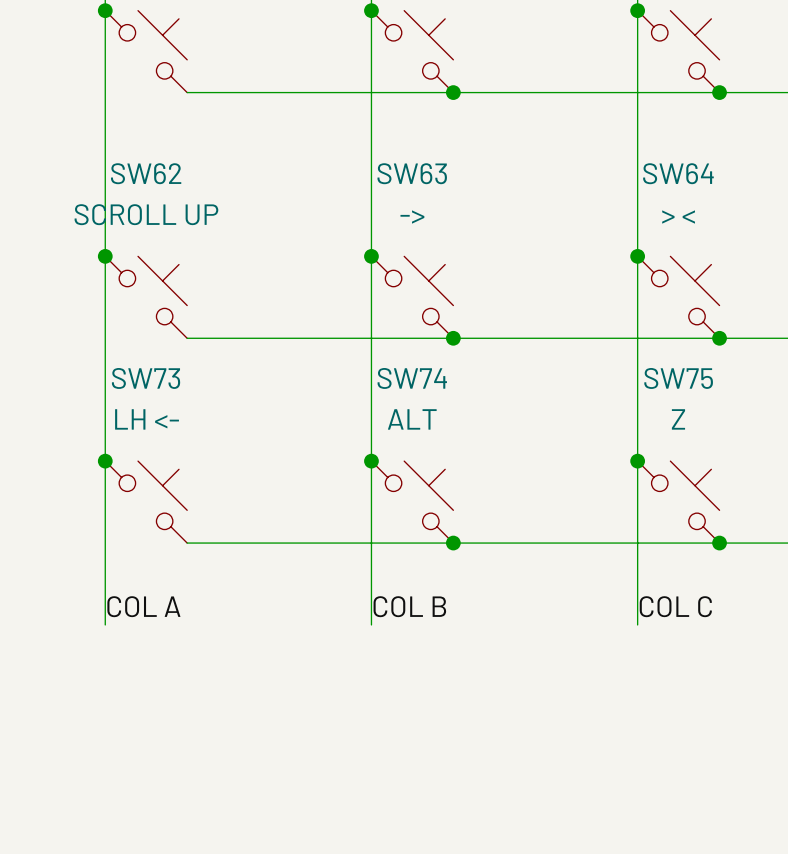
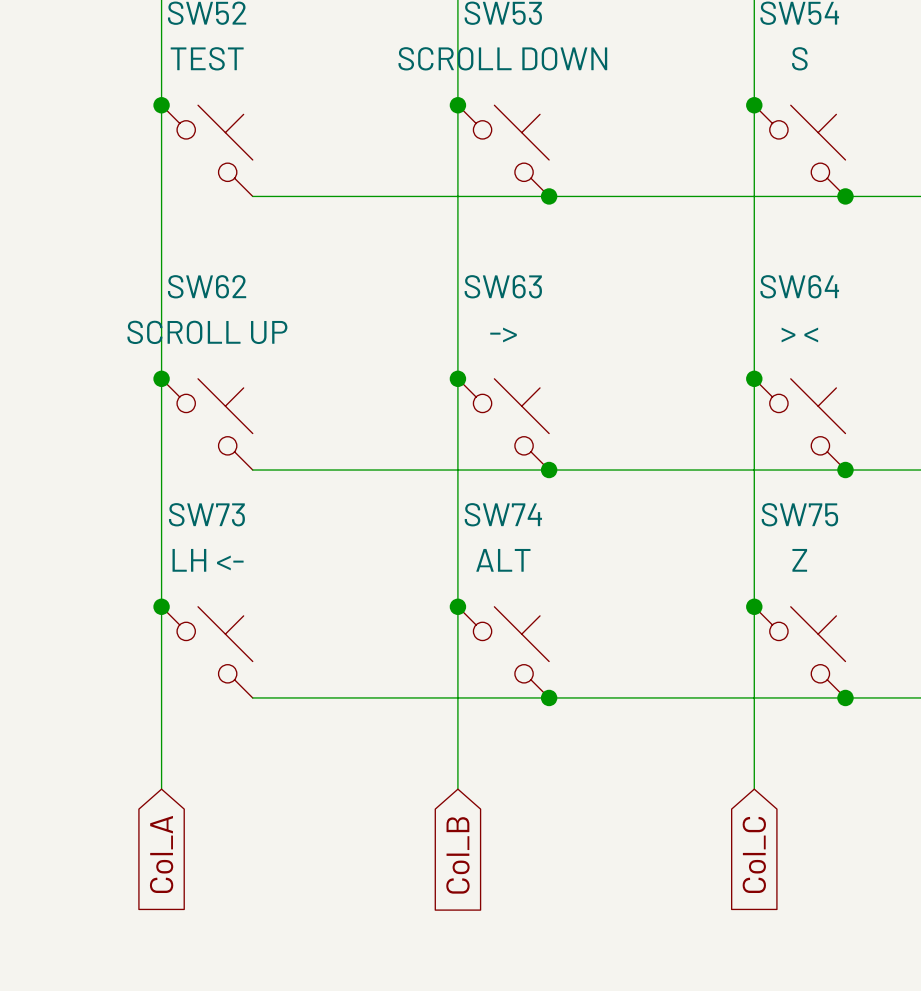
label: COL A (143, 606) -> none
label: COL B (409, 606) -> none
label: COL C (675, 606) -> none
global label: none -> Col_A (161, 854)
global label: none -> Col_B (457, 855)
global label: none -> Col_C (754, 854)

